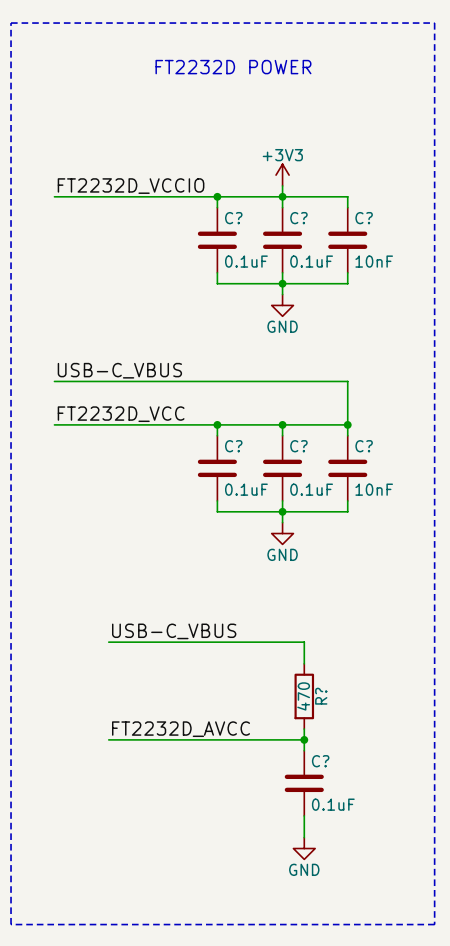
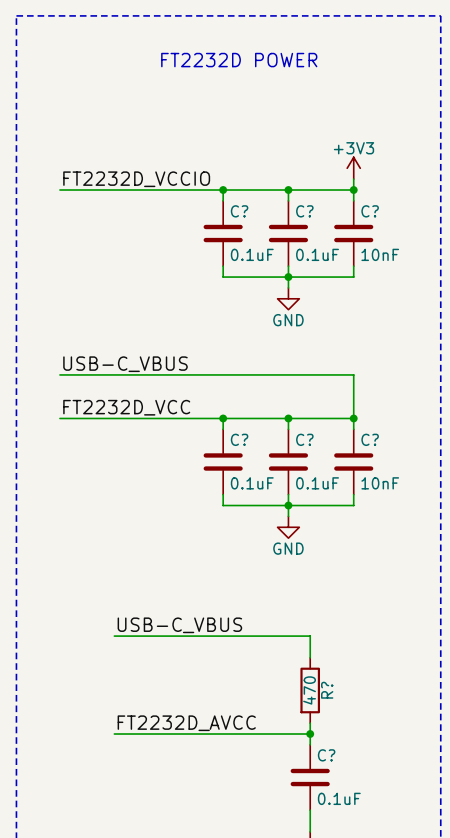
power symbol position: +3V3 (282, 175) -> +3V3 (353, 168)
wire: (282, 185) (282, 196) -> (353, 179) (353, 190)
junction: none -> (353, 190)

